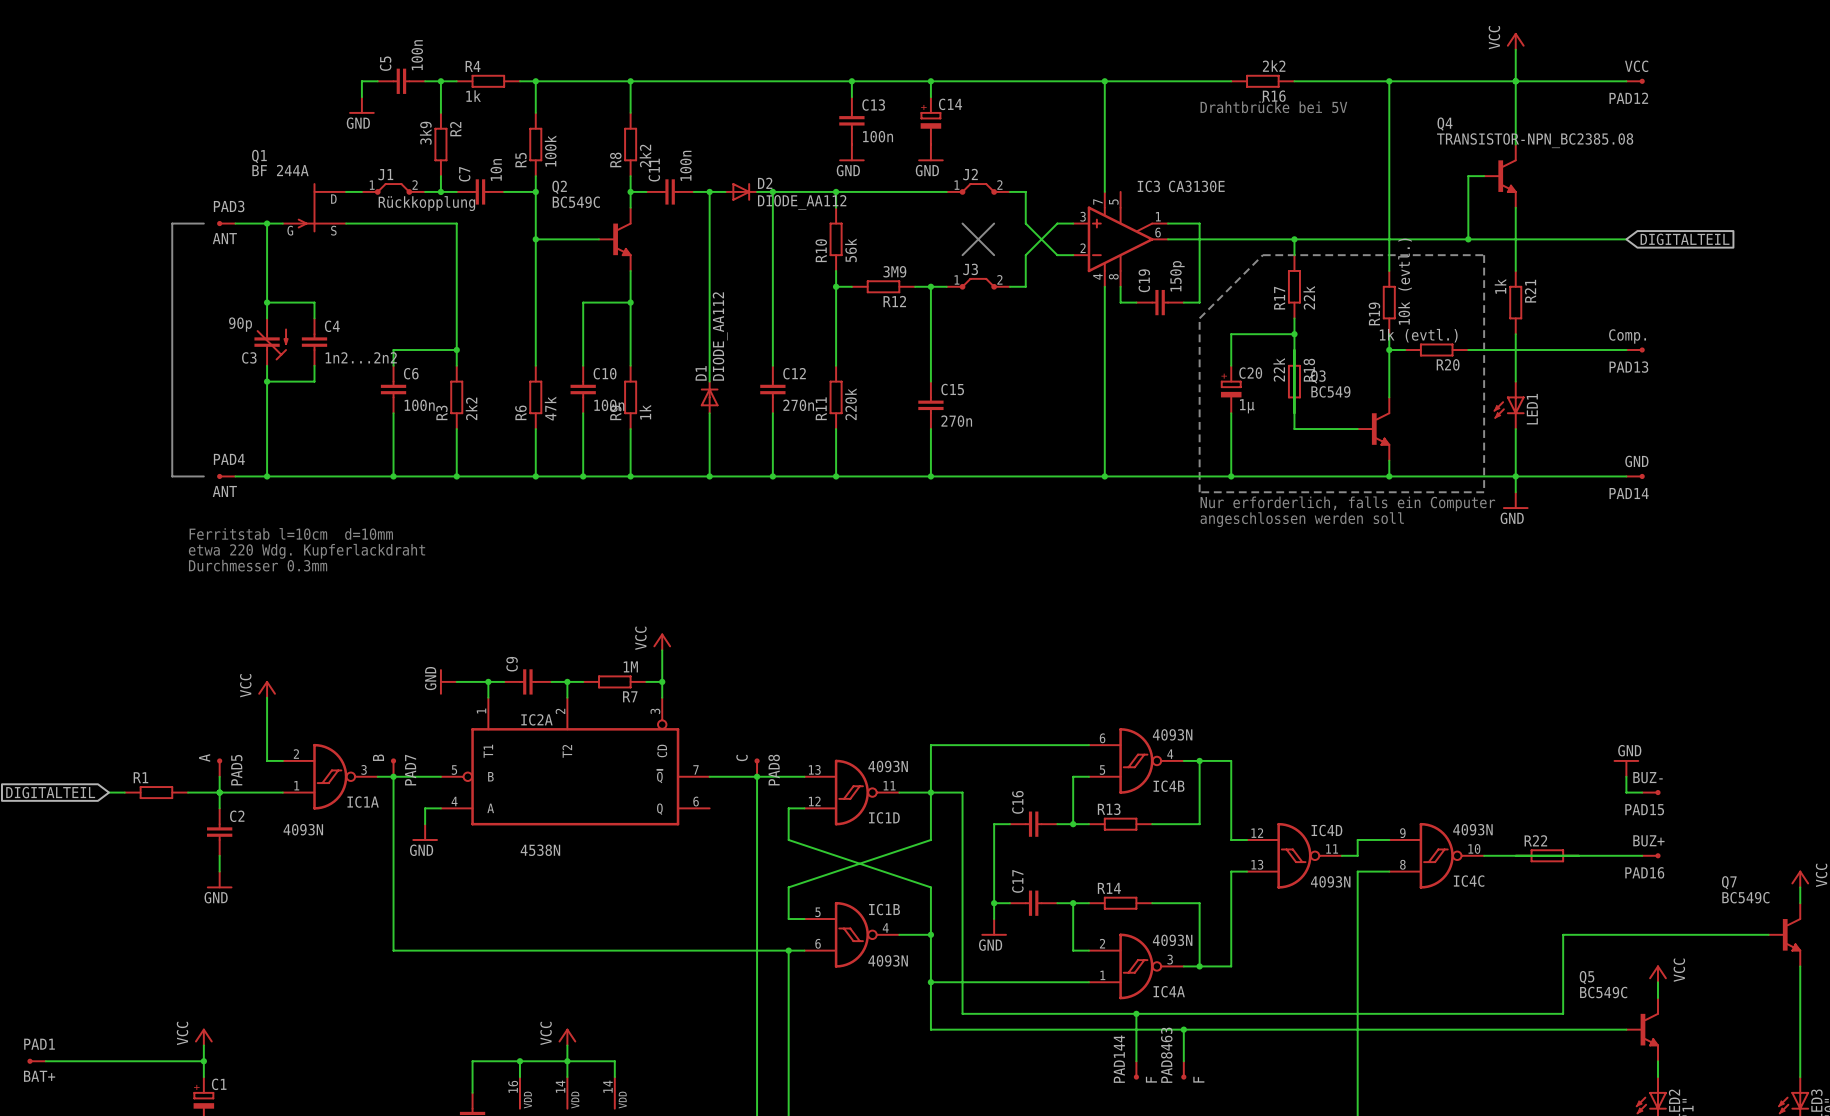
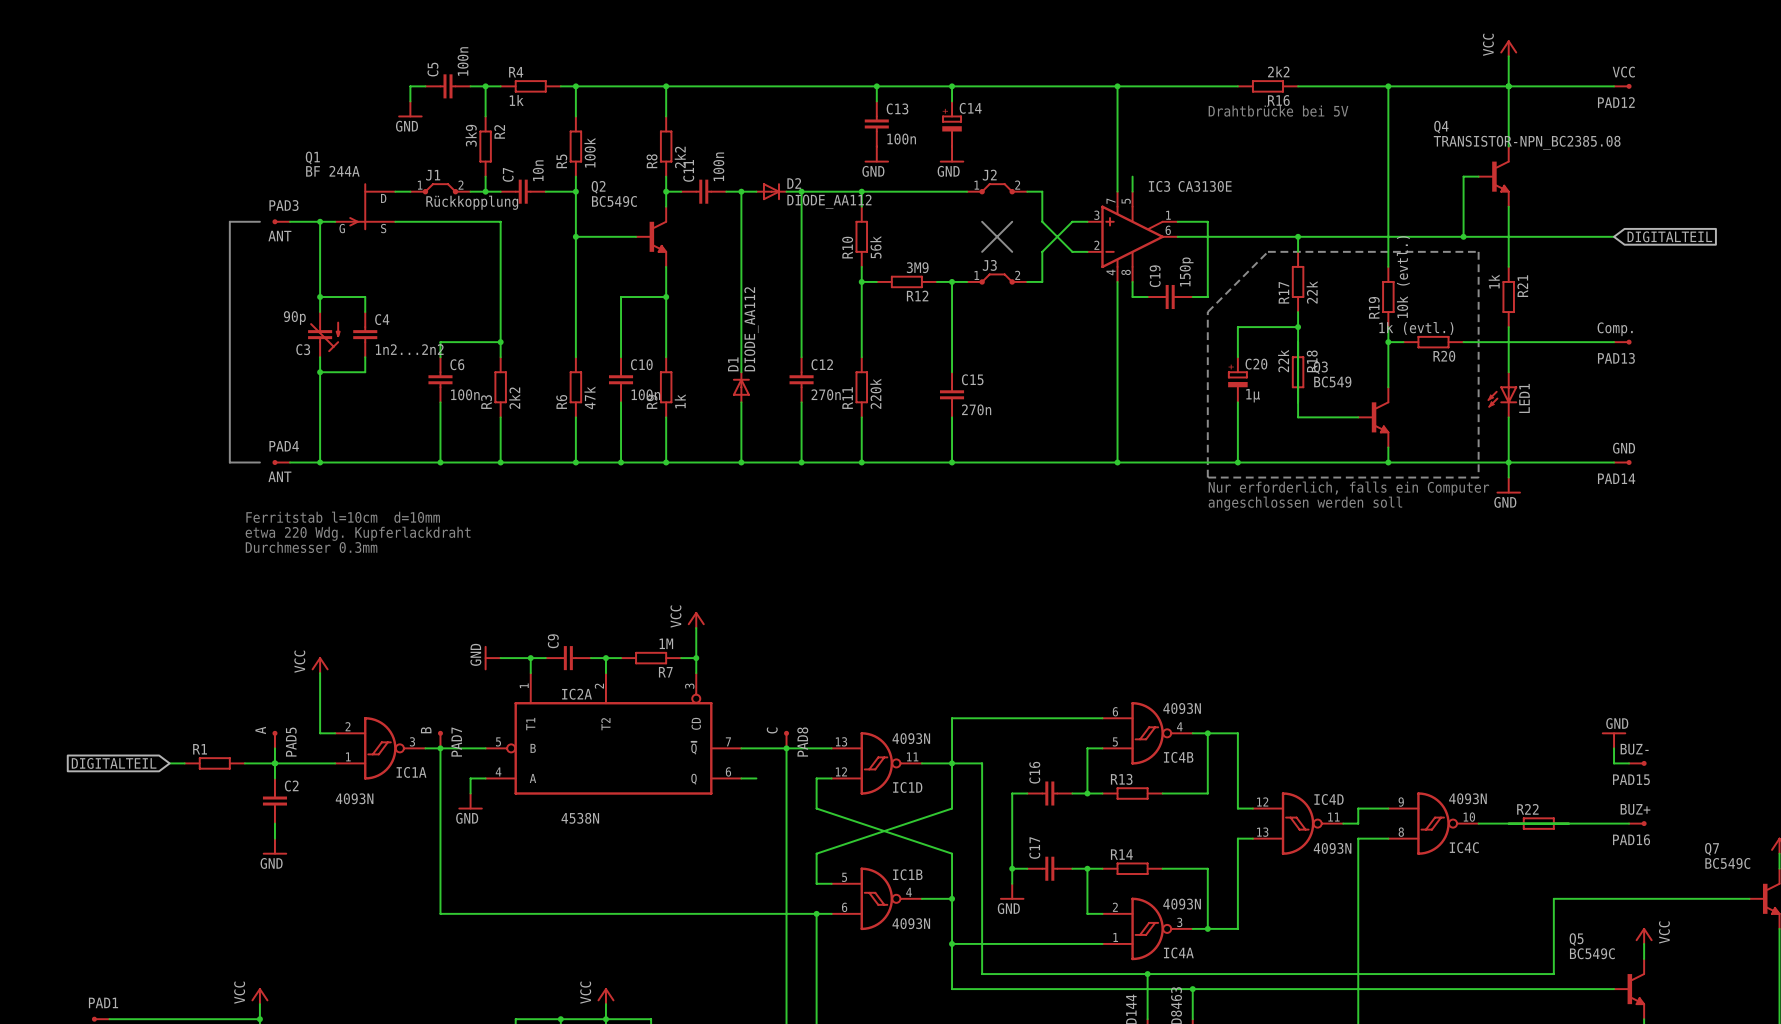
wire: none -> (1132, 176) (1132, 191)
wire: none -> (741, 778) (756, 778)

